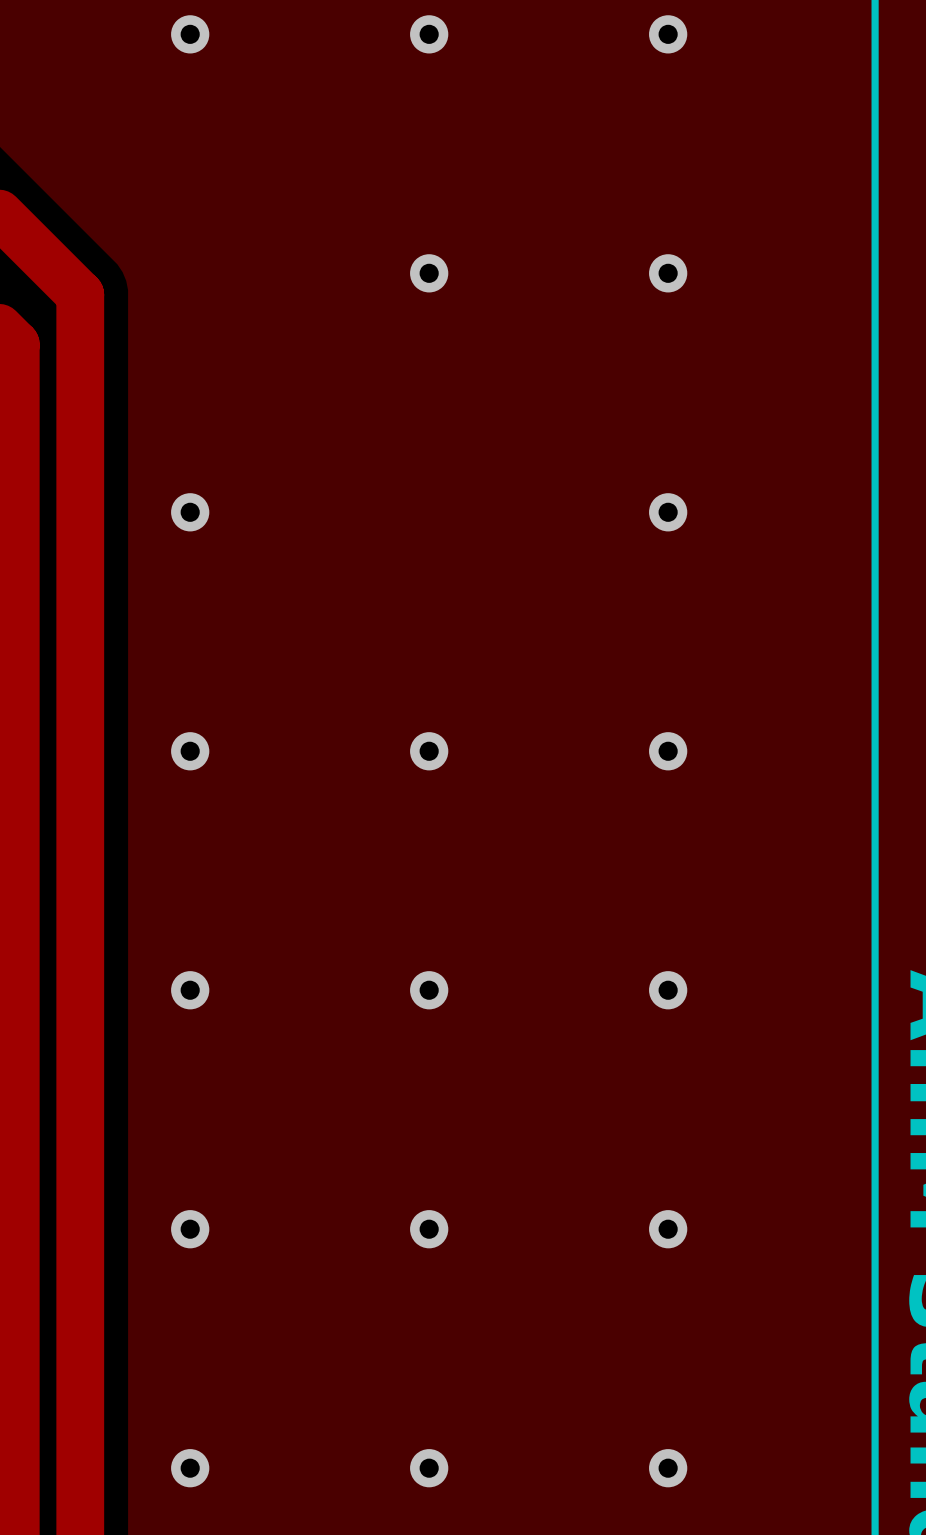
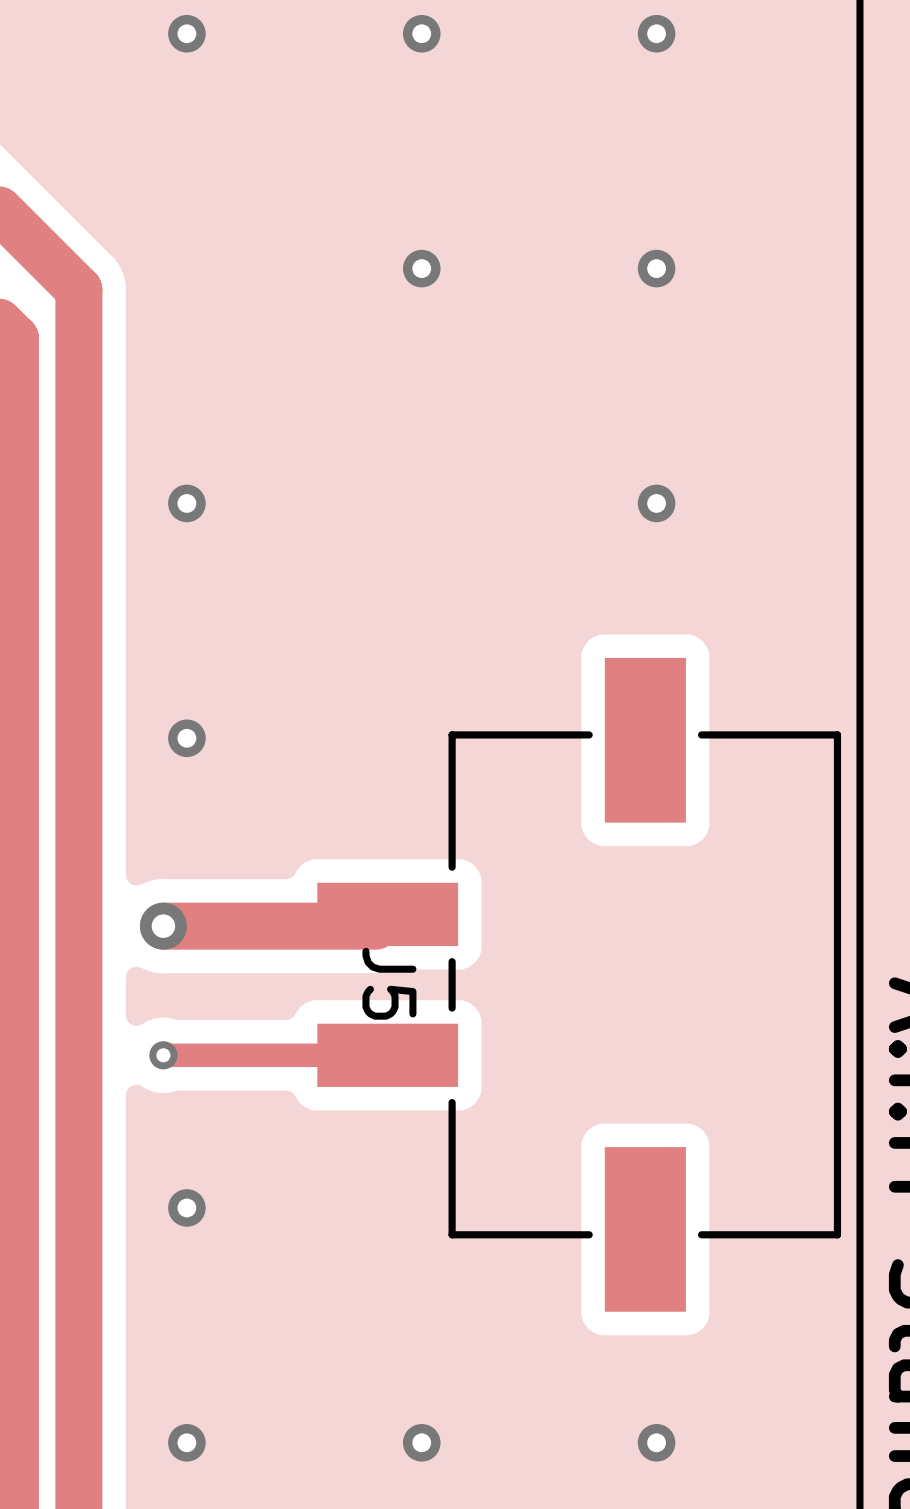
via: (429, 751) -> none
via: (668, 751) -> none
track: none -> (387, 914) (375, 926) (163, 926)
via: none -> (163, 926)
via: (190, 990) -> none
via: (429, 990) -> none
via: (668, 990) -> none
J5: none -> (579, 984)
track: none -> (163, 1055) (387, 1055)
via: none -> (163, 1055)
via: (429, 1229) -> none
via: (668, 1229) -> none

